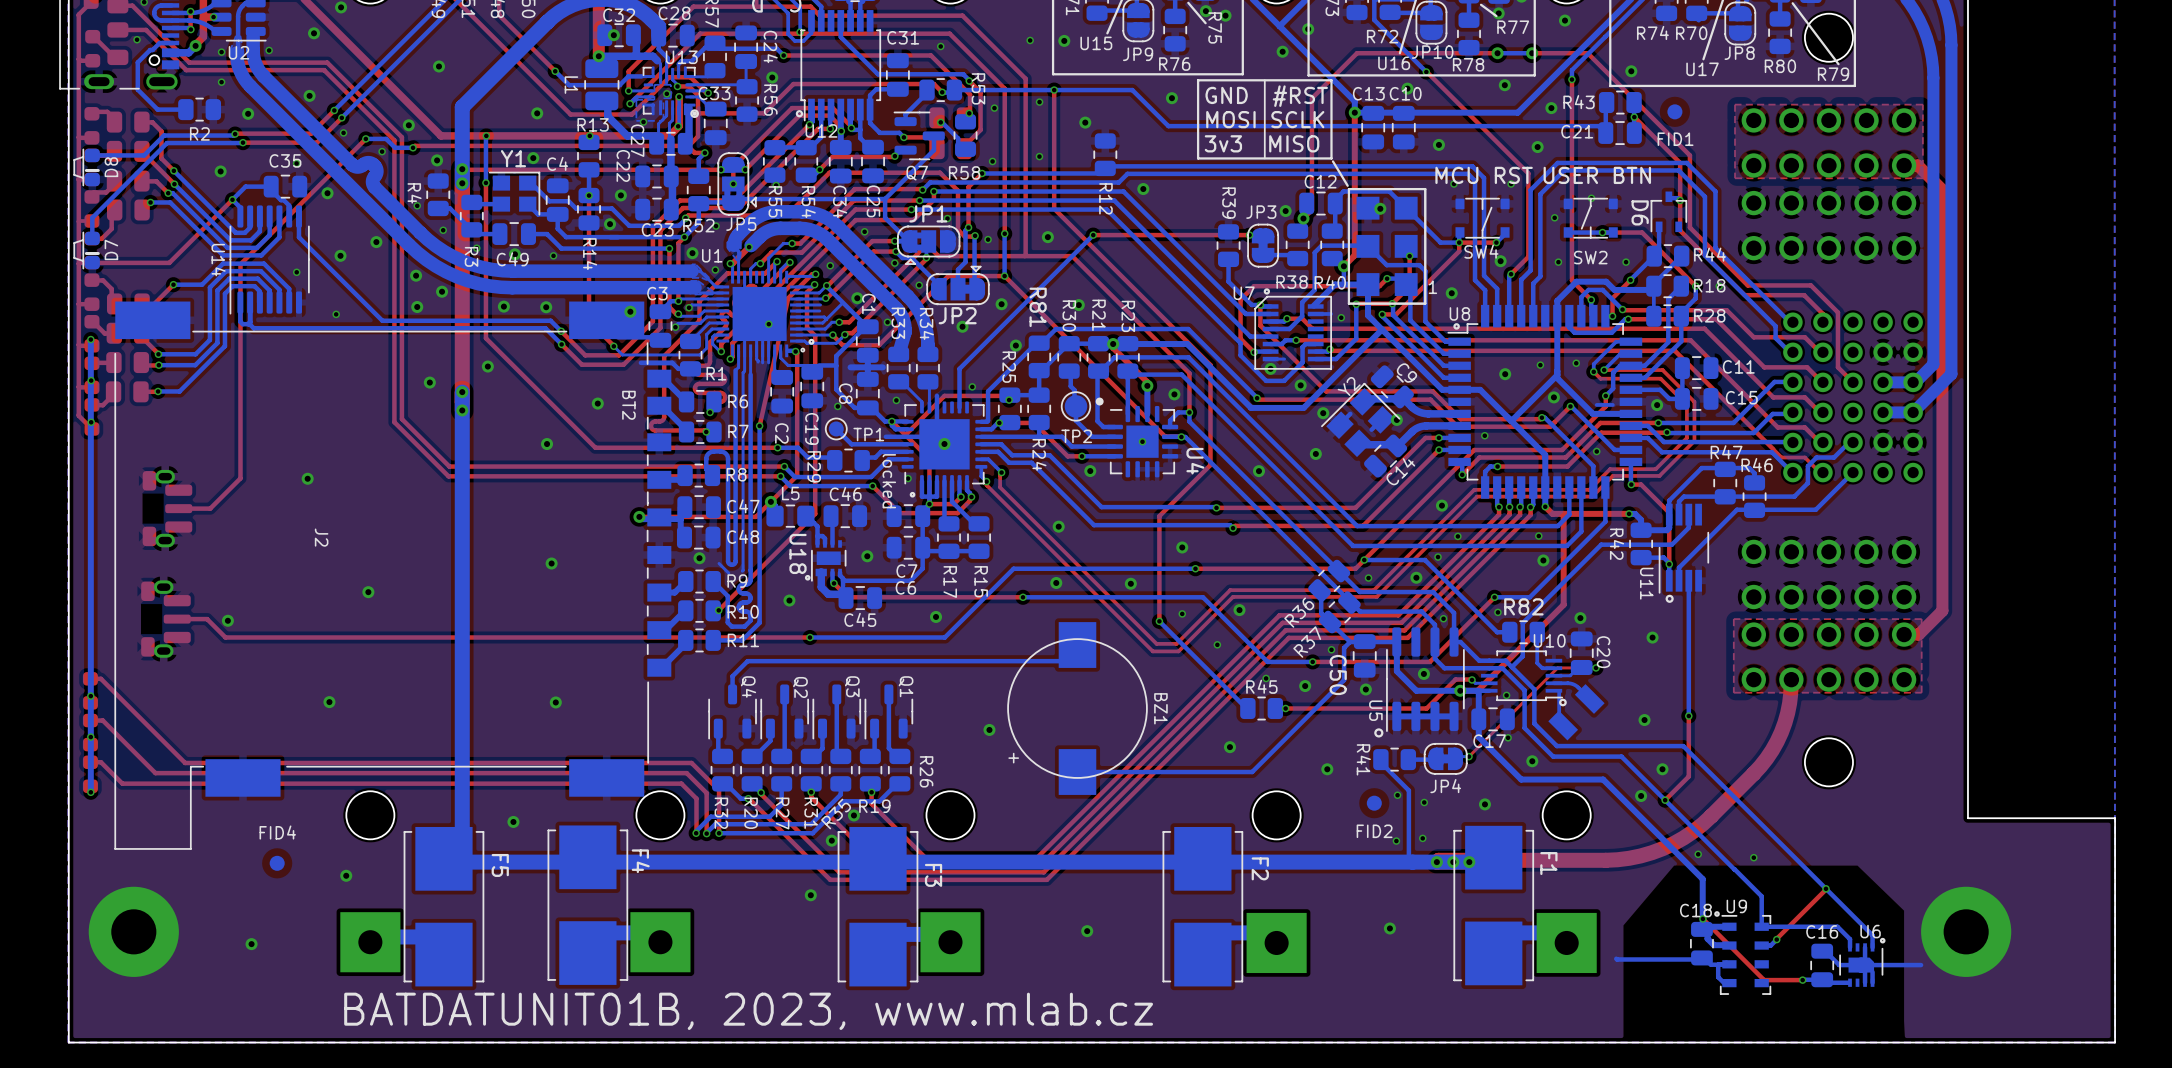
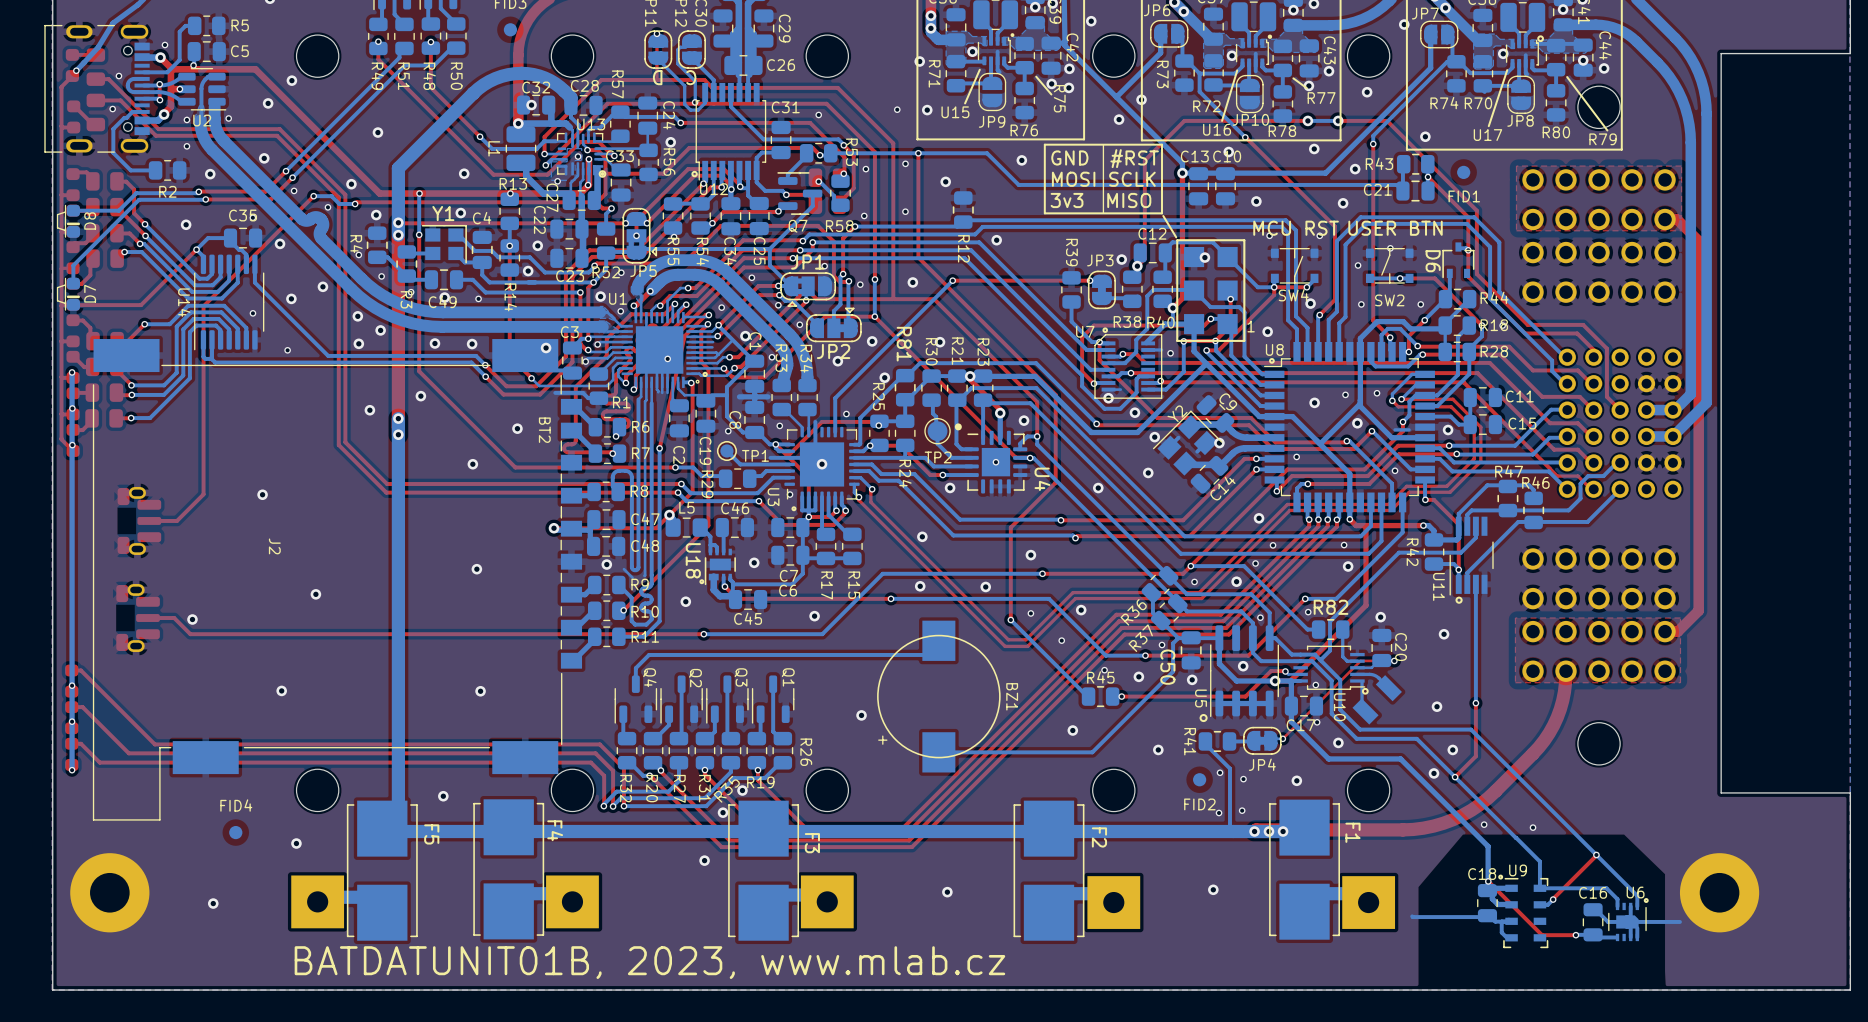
locked name: locked (889, 481) -> U3 (773, 497)
U10 name rotation: 0° (1549, 640) -> 90° clockwise (1339, 707)
U10 name position: U10 (1549, 640) -> U10 (1339, 707)

